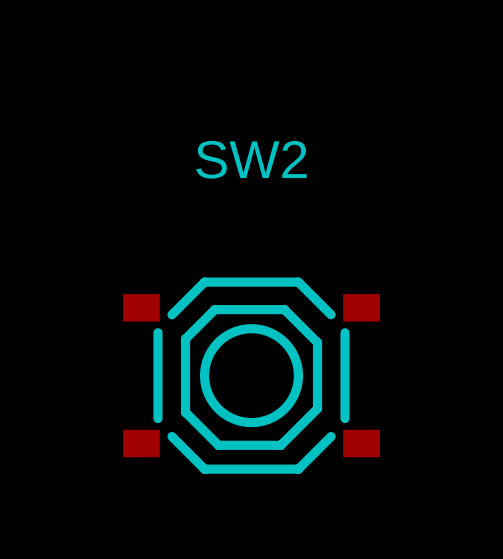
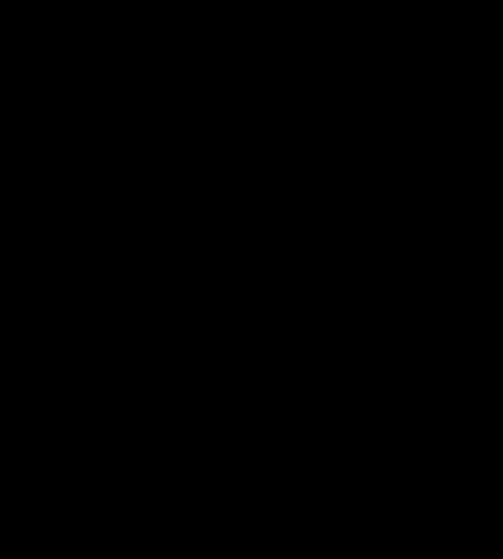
SW2: (251, 375) -> none

